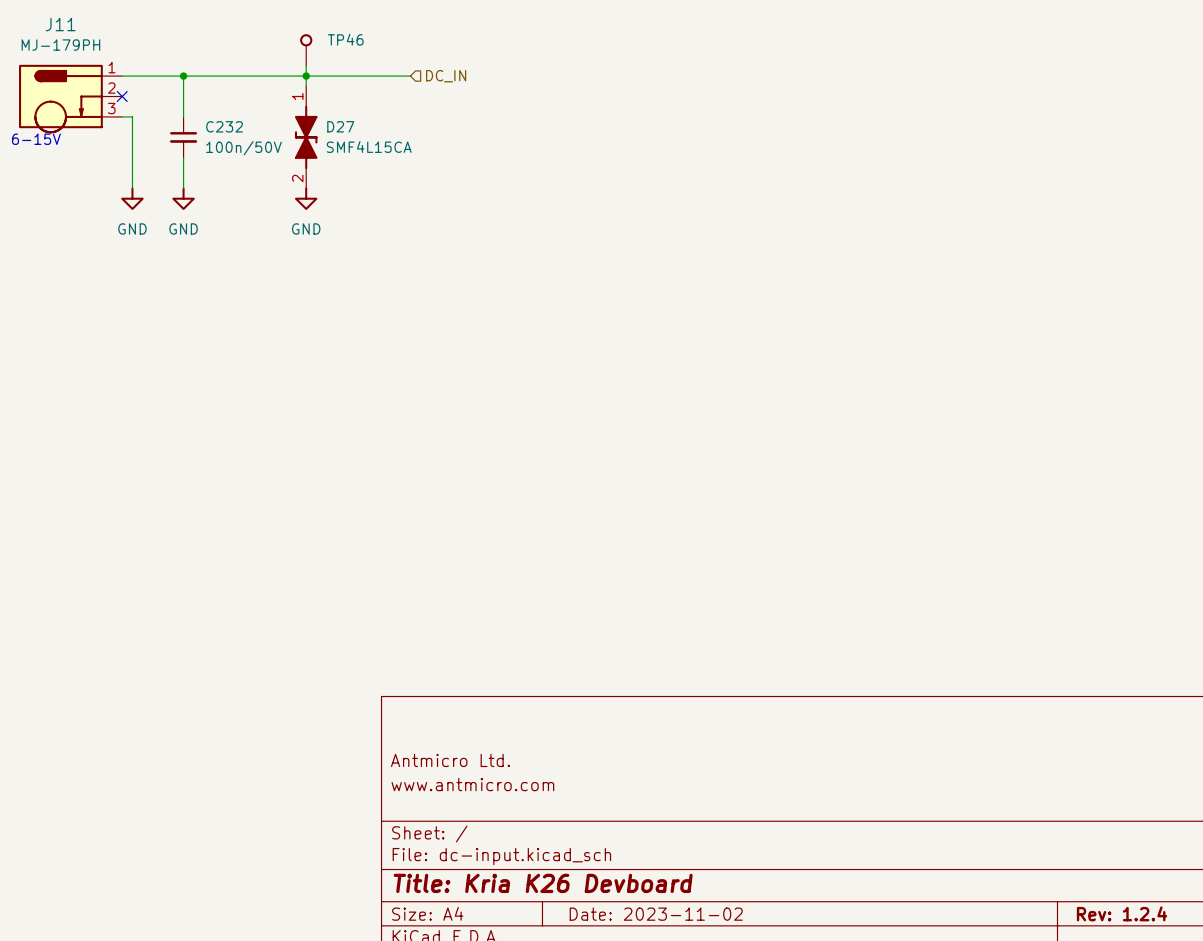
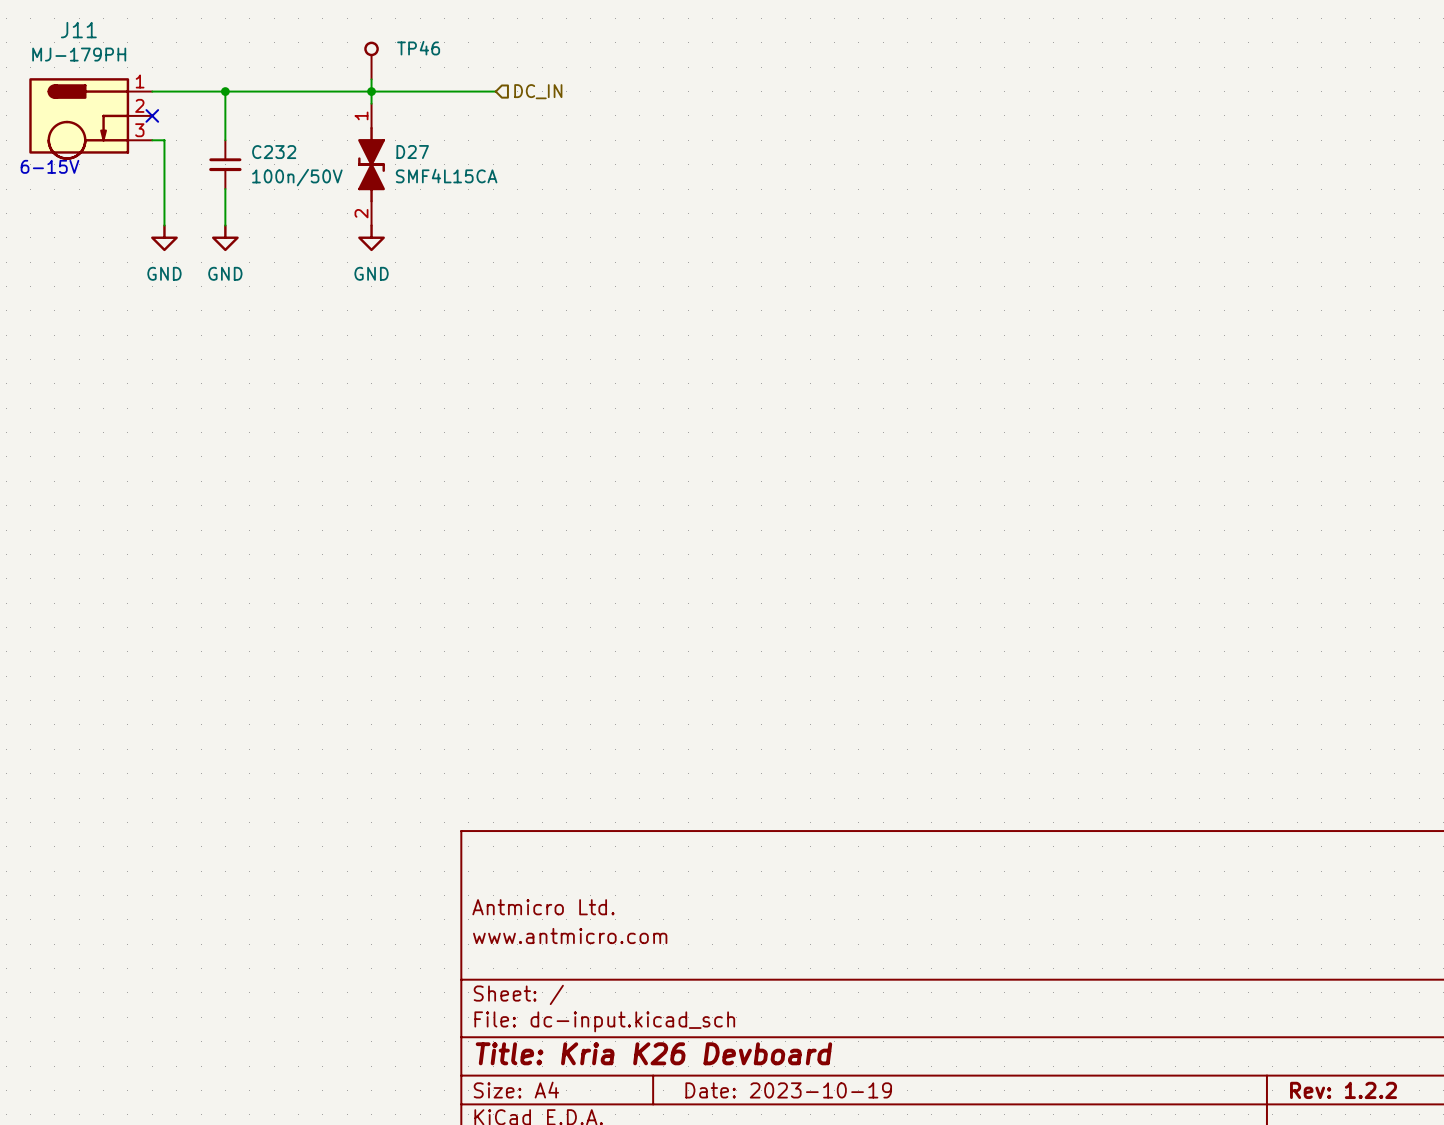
title block: Rev: 1.2.4 (1122, 913) -> Rev: 1.2.2 (1343, 1090)
title block: Date: 2023-11-02 (656, 914) -> Date: 2023-10-19 (788, 1090)

